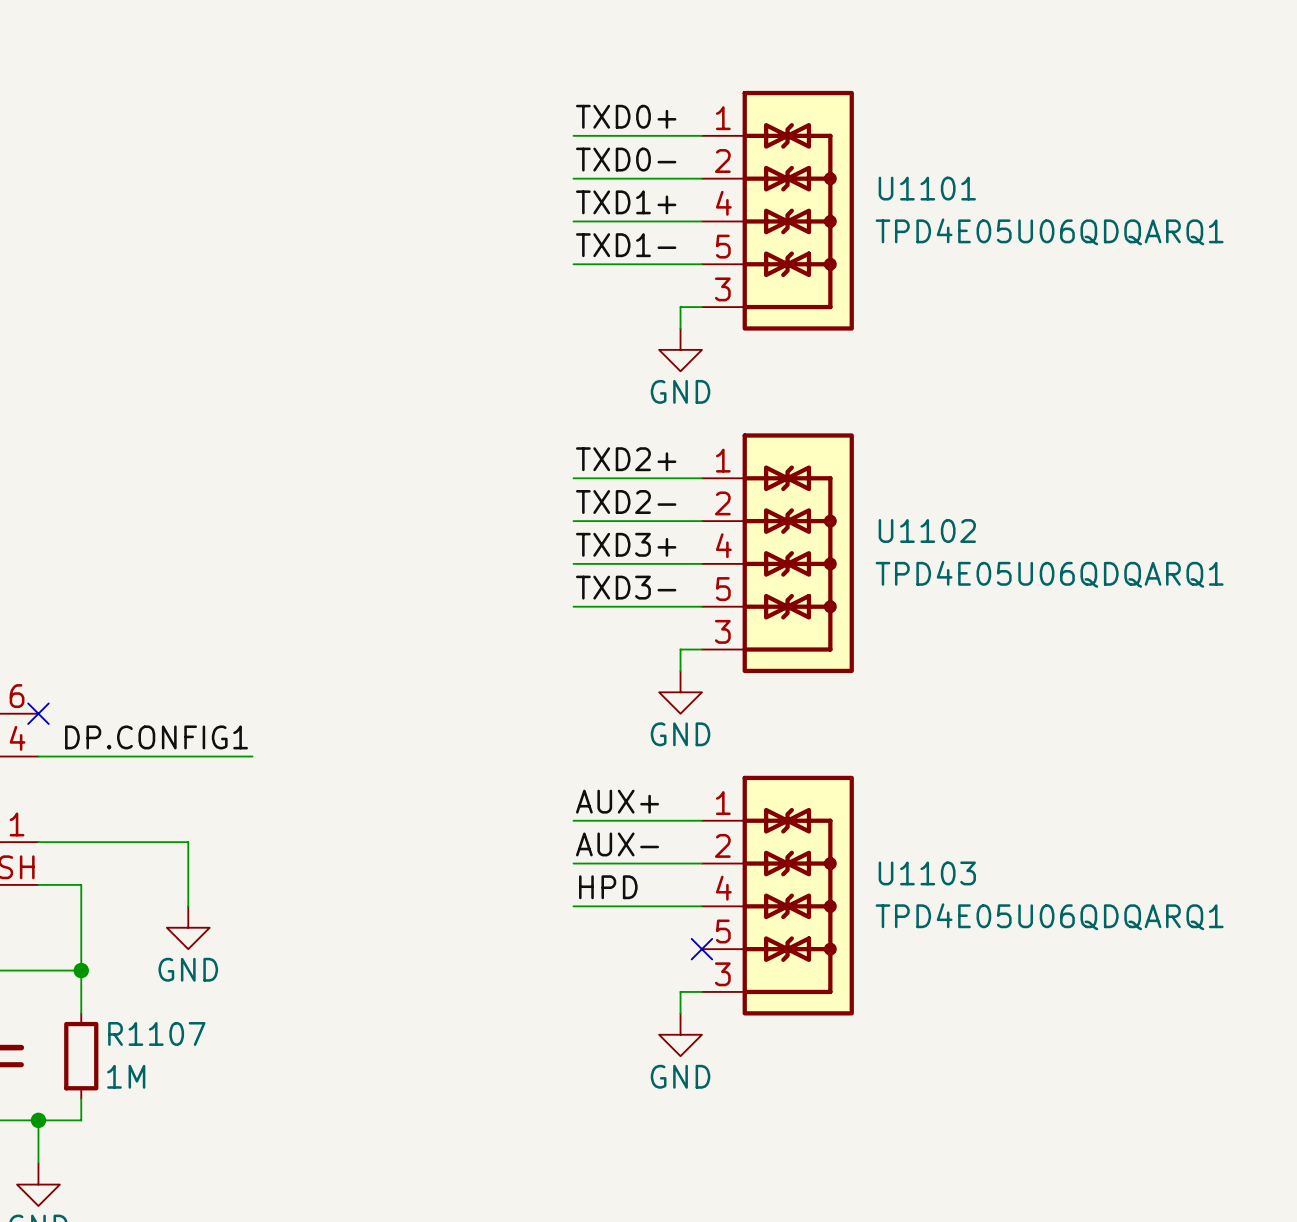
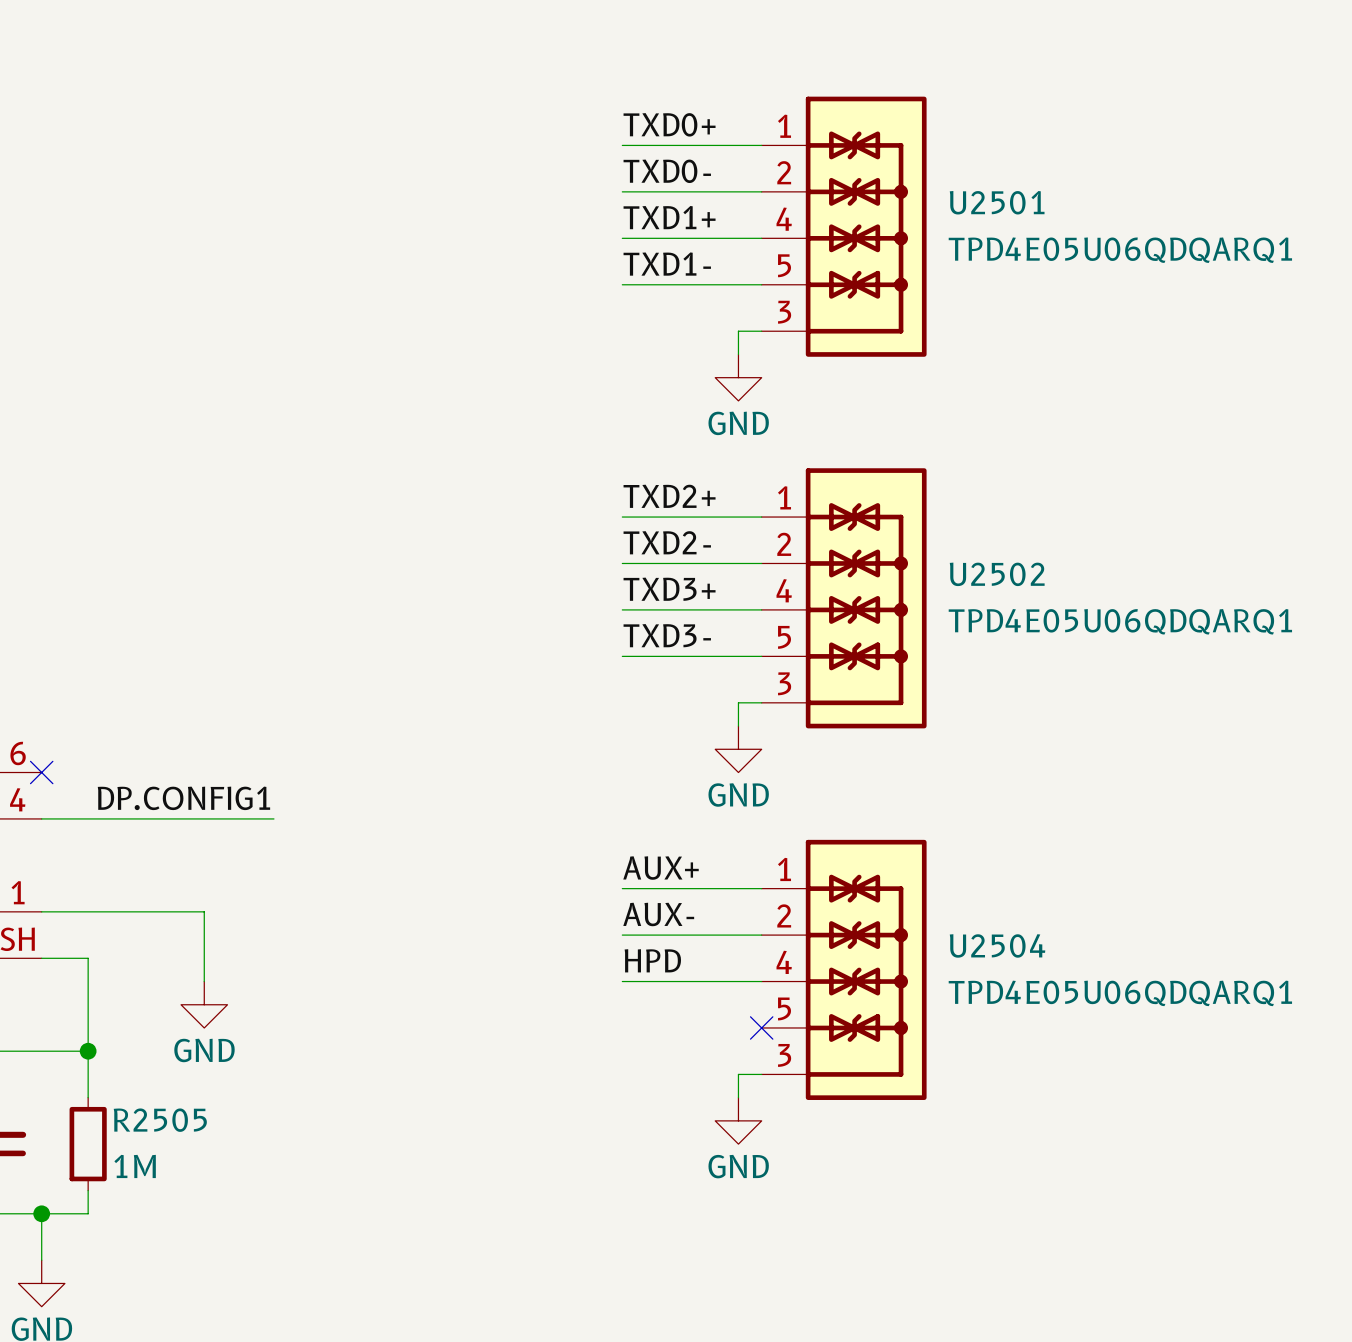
U1101 name: U1101 (927, 188) -> U2501 (997, 202)
U1102 name: U1102 (927, 531) -> U2502 (997, 574)
U1103 name: U1103 (927, 873) -> U2504 (997, 945)
R1107 name: R1107 (156, 1033) -> R2505 (160, 1120)

